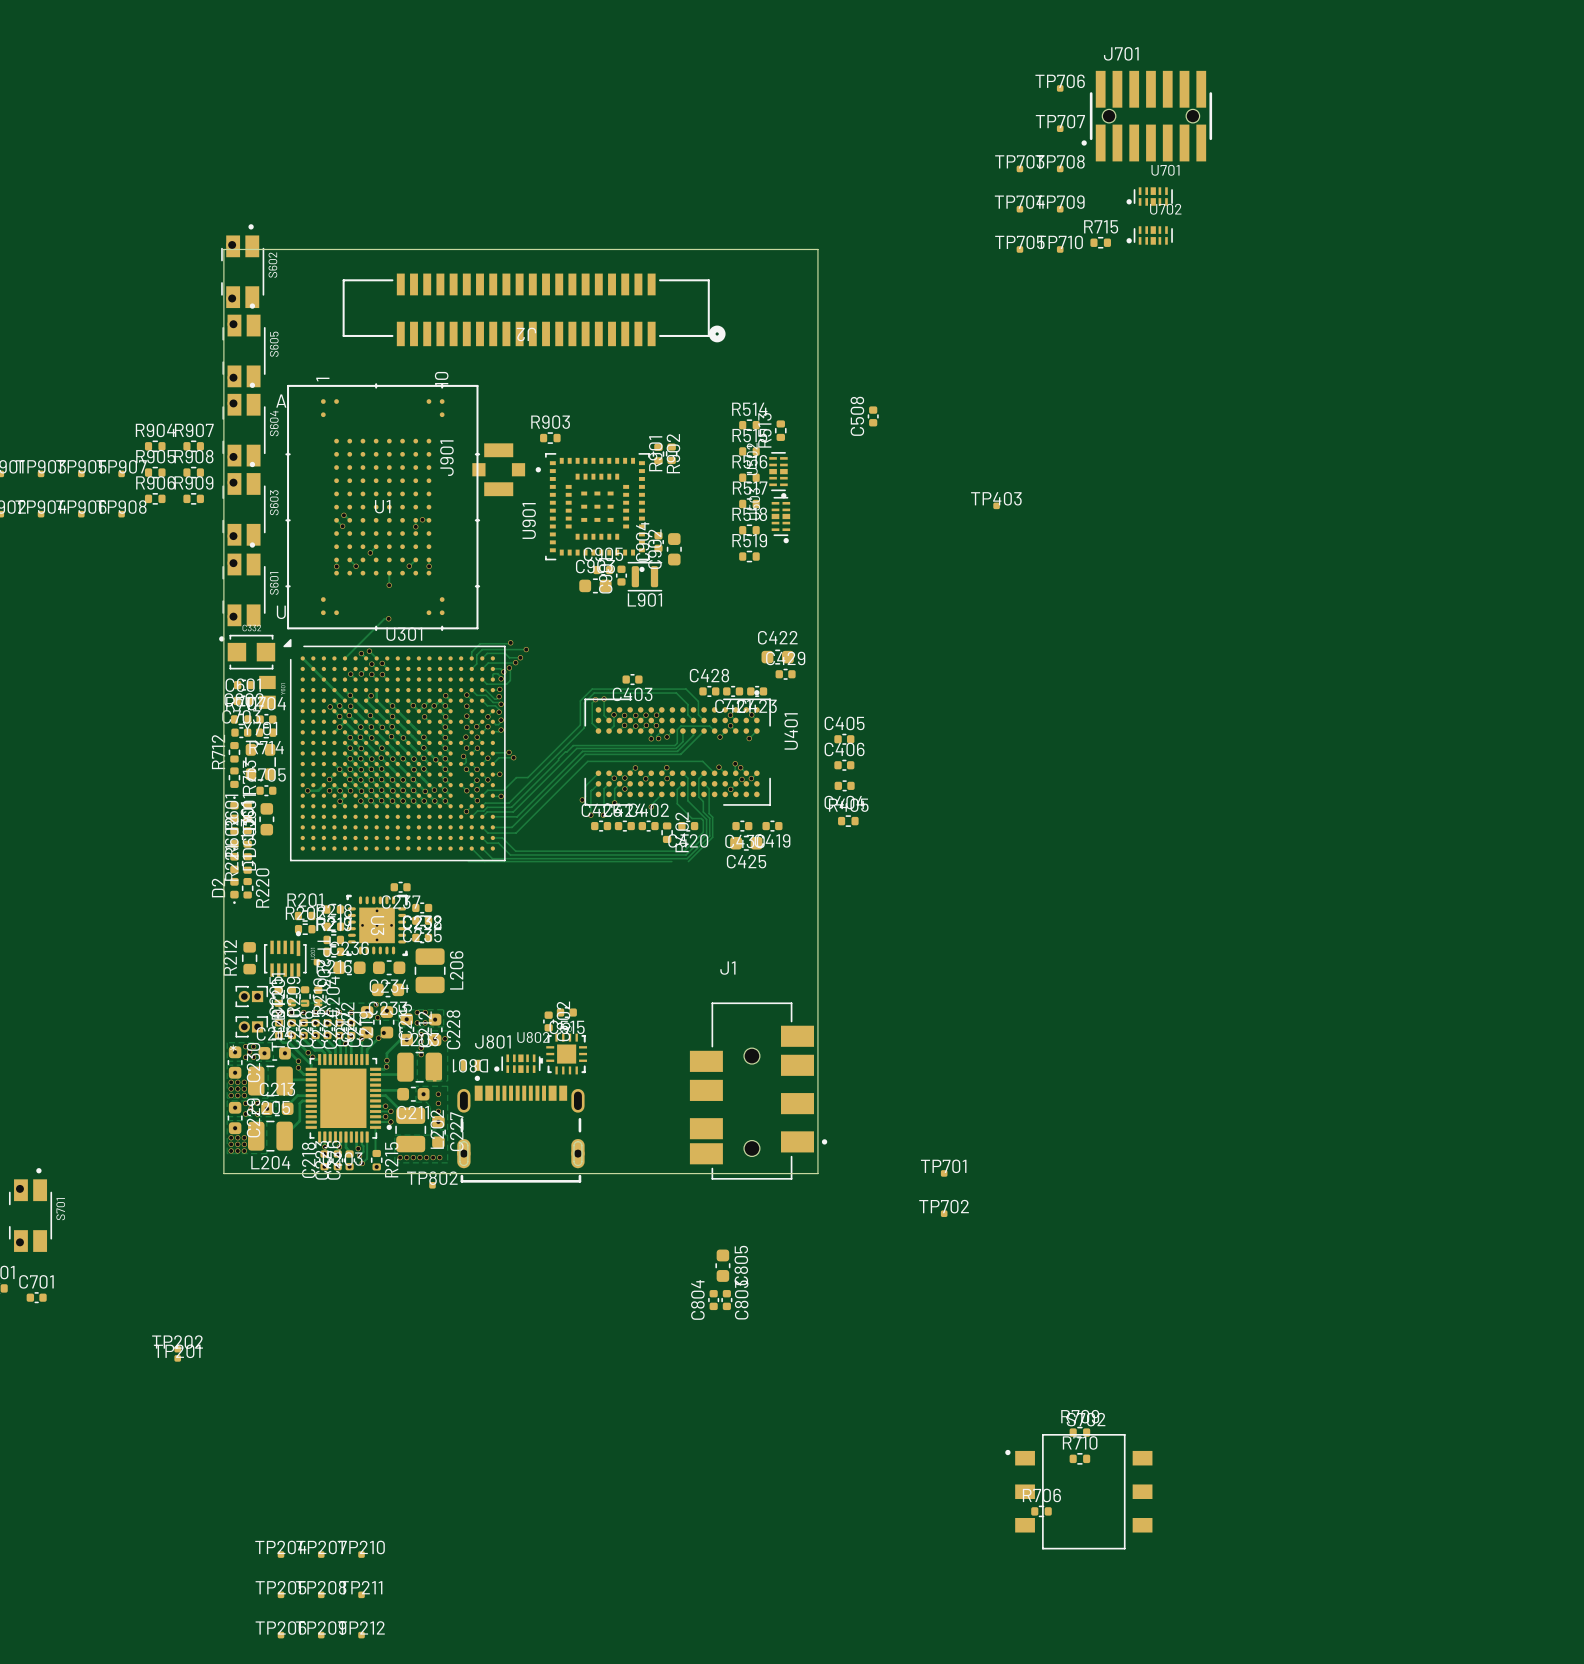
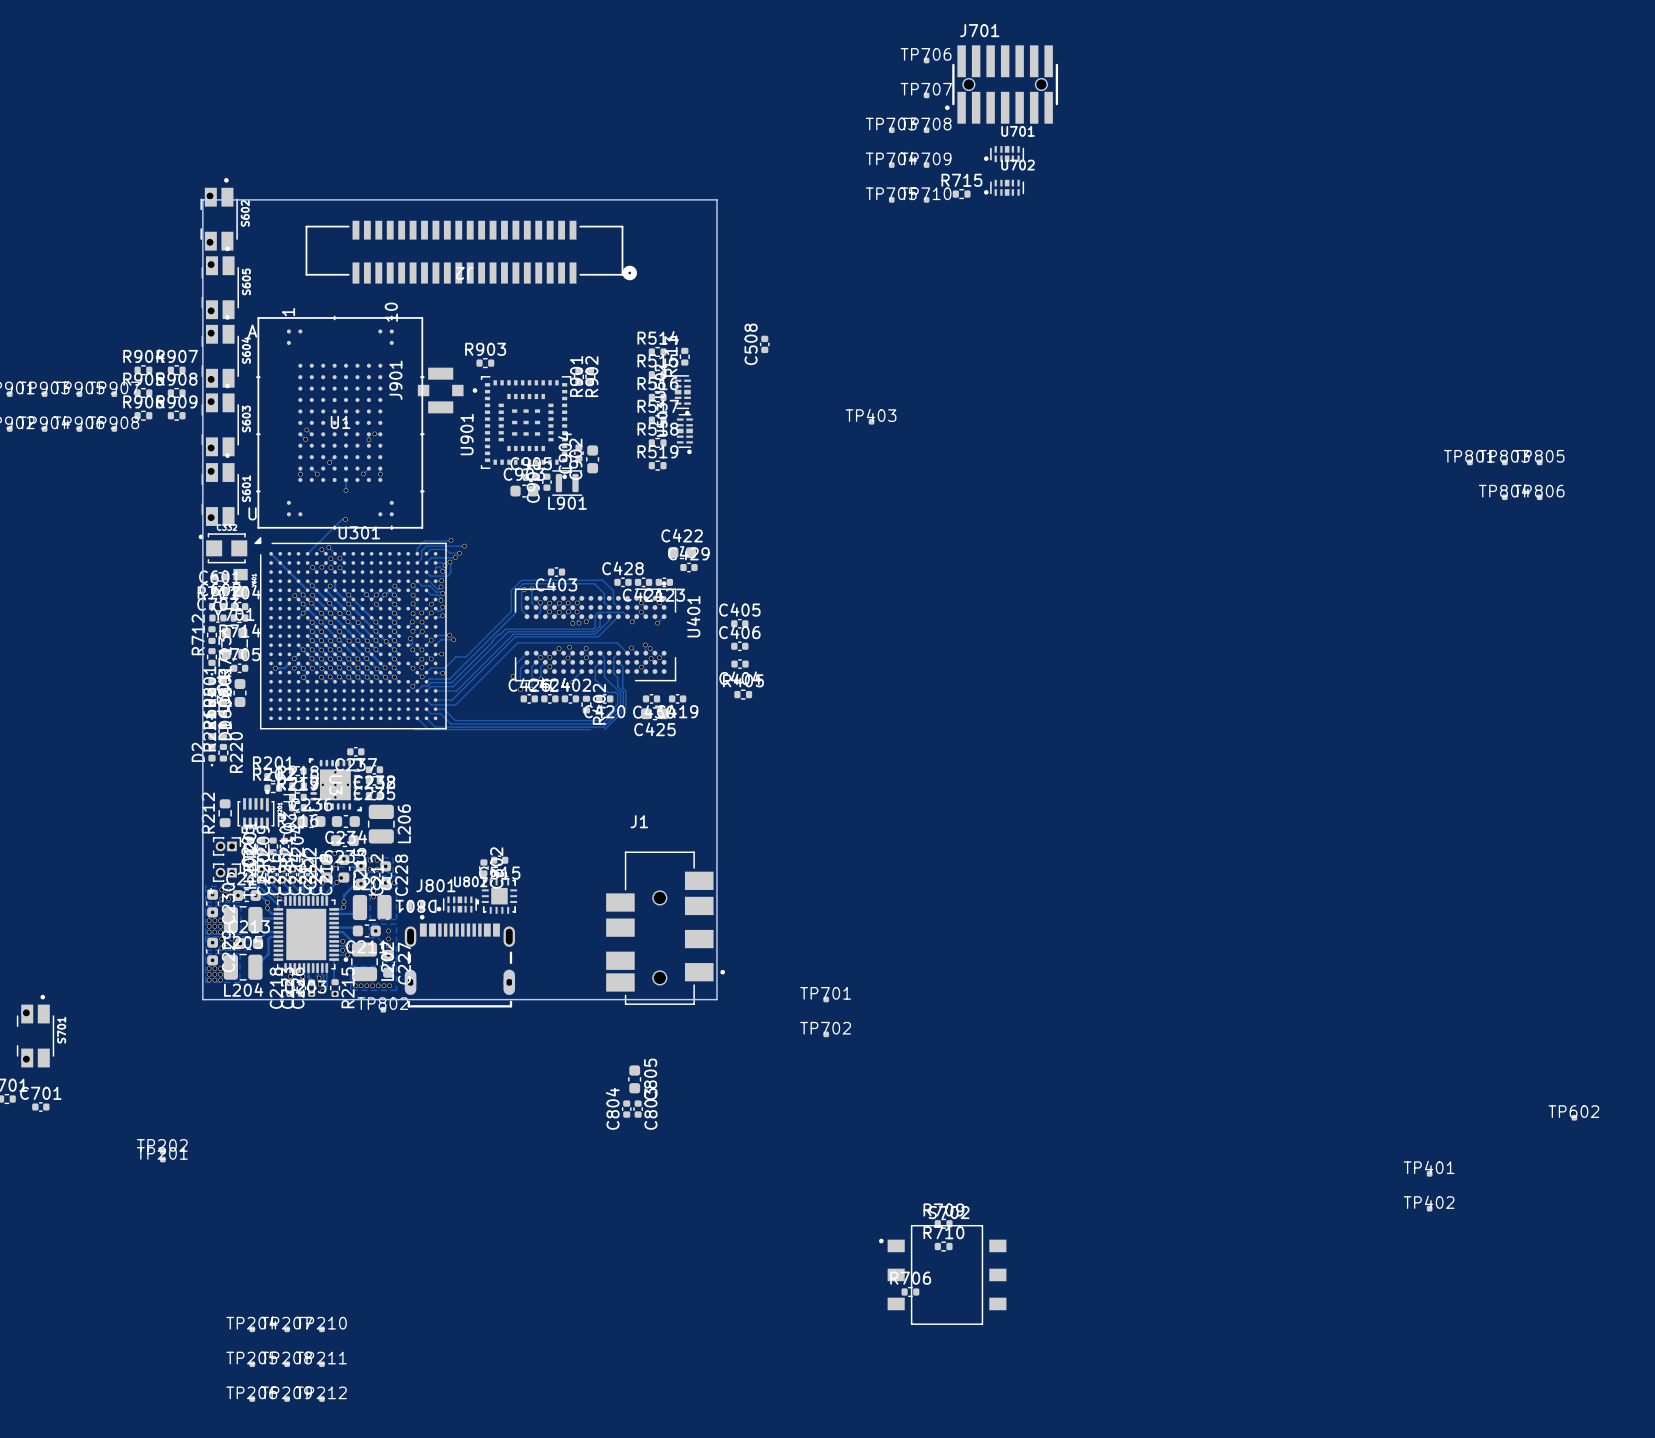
via: none -> (569, 647)

